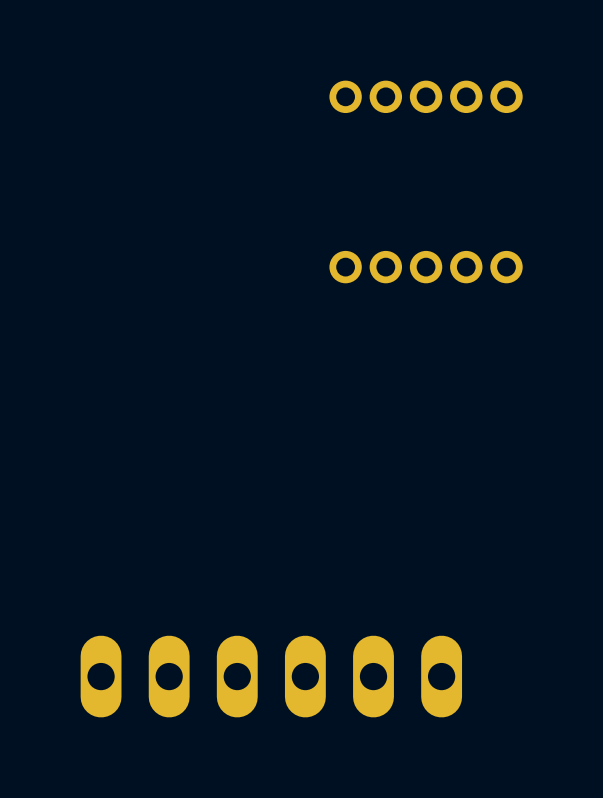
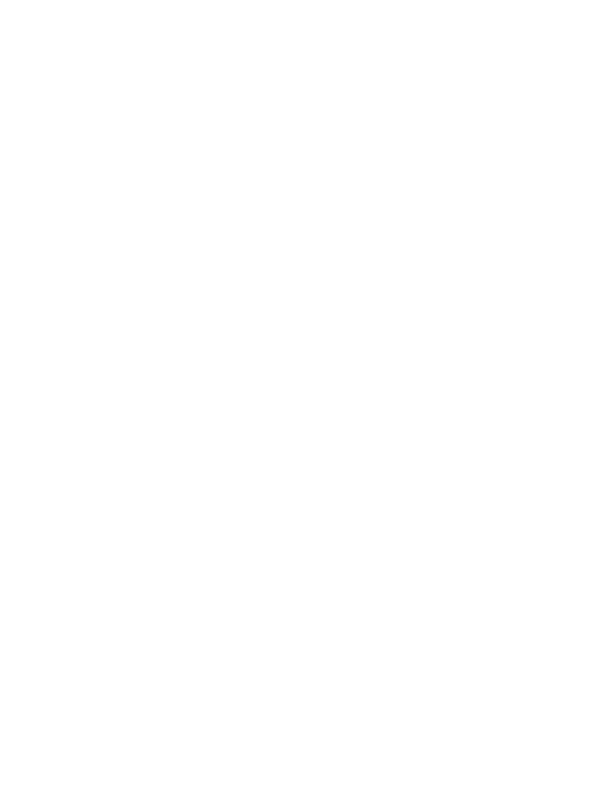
part: (426, 96) -> none
part: (426, 267) -> none
part: (271, 676) -> none

